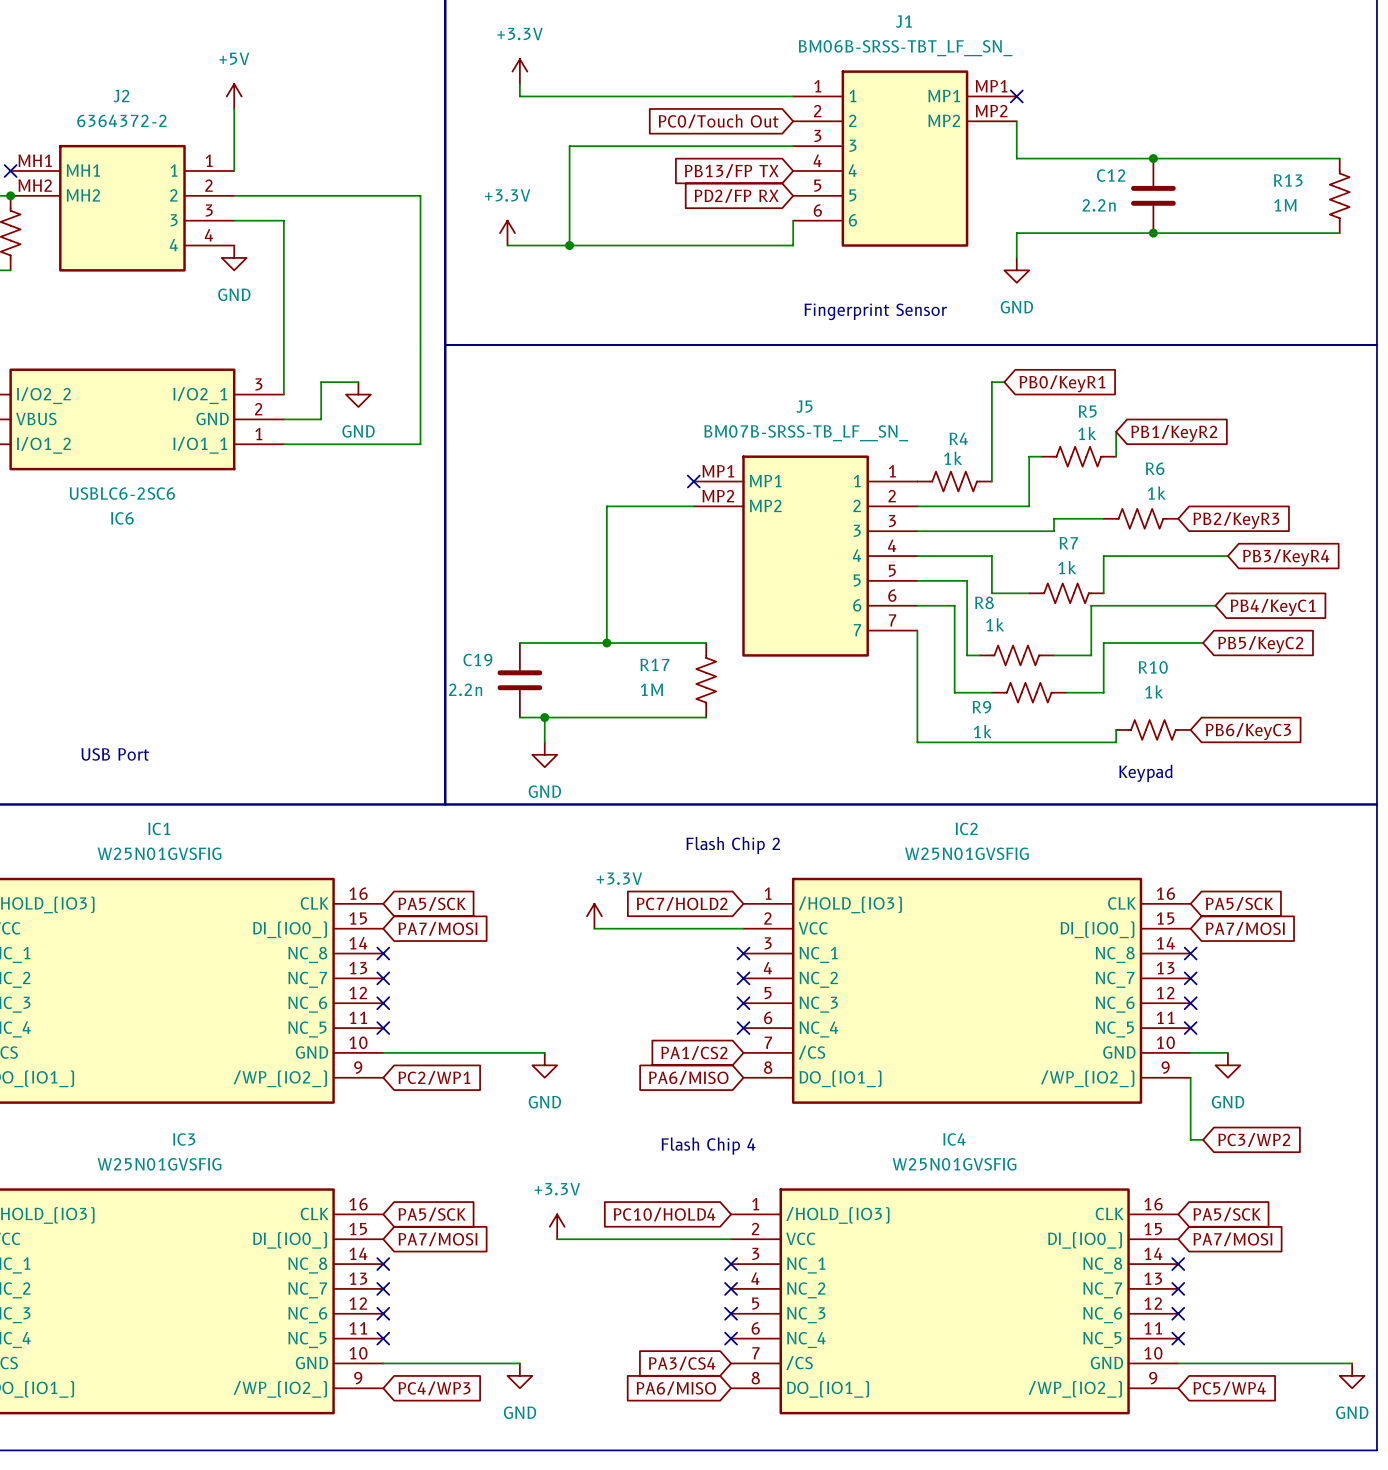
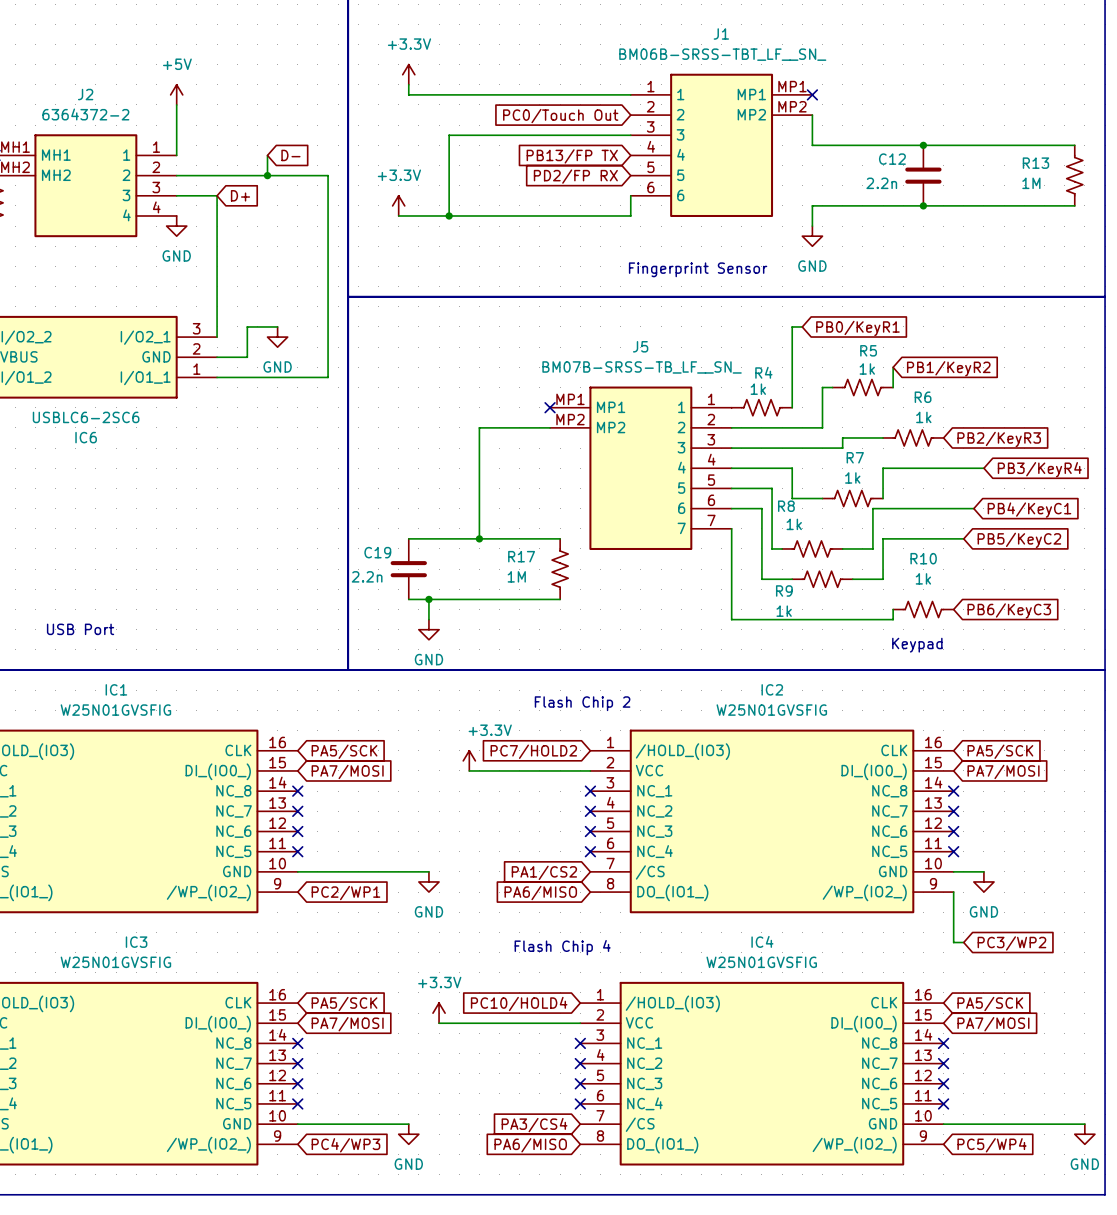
wire: none -> (267, 155) (267, 175)
global label: none -> D- (290, 155)
junction: none -> (267, 175)
global label: none -> D+ (240, 195)

